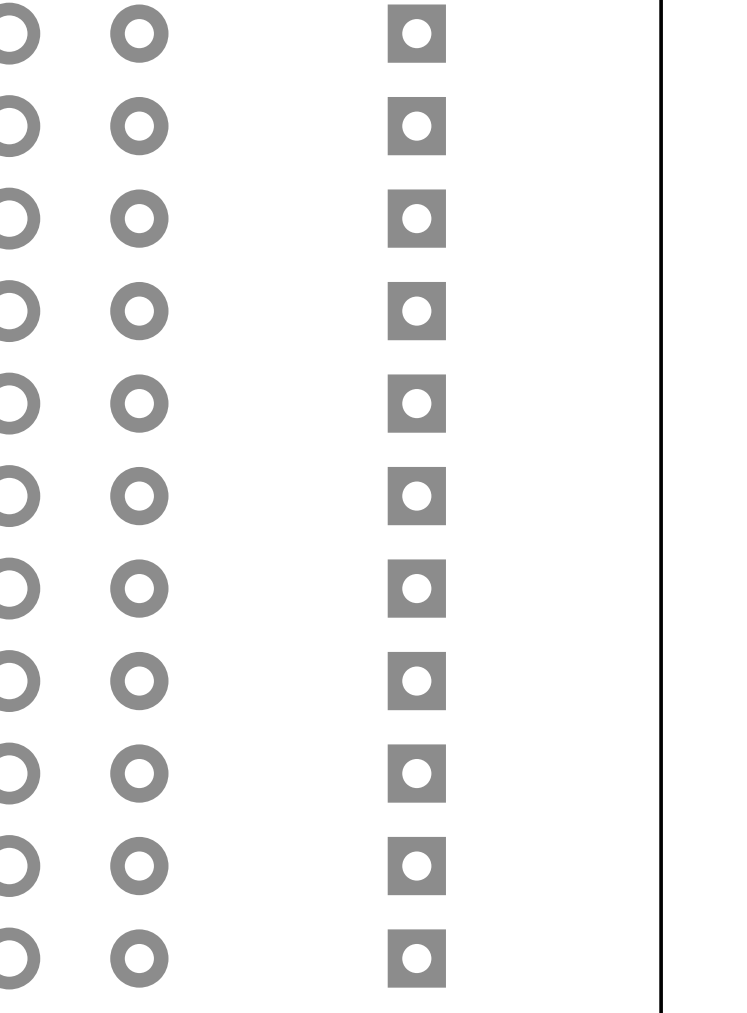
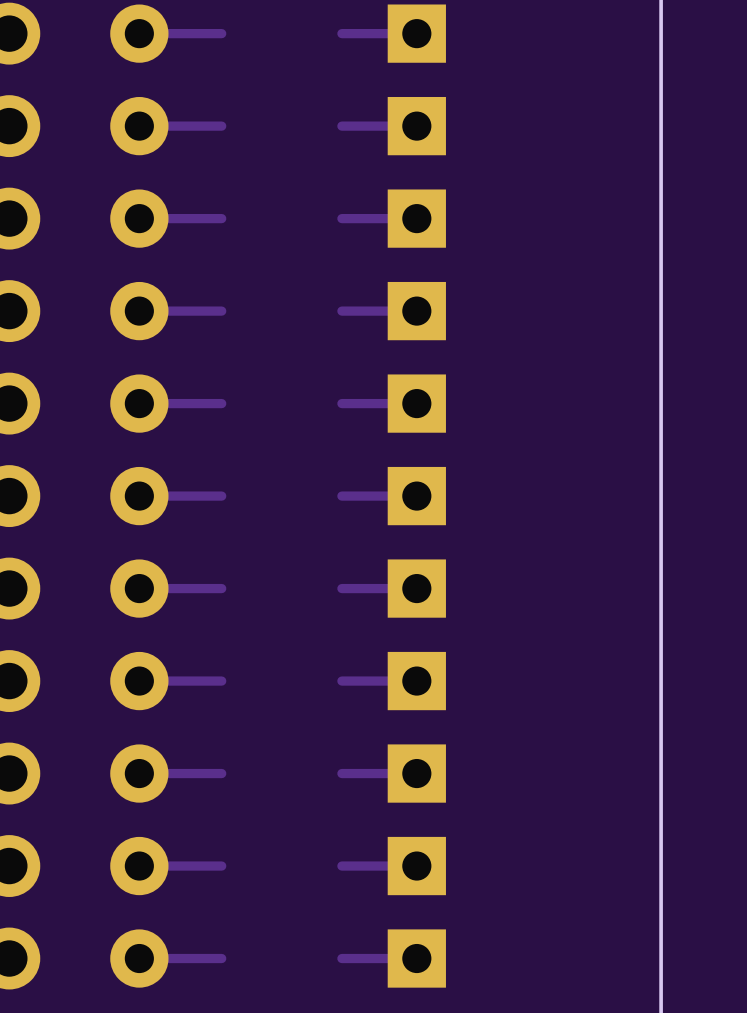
track: none -> (221, 33) (142, 33)
track: none -> (420, 33) (341, 33)
track: none -> (221, 126) (142, 126)
track: none -> (420, 126) (341, 126)
track: none -> (221, 218) (142, 218)
track: none -> (420, 218) (341, 218)
track: none -> (221, 311) (142, 311)
track: none -> (420, 311) (341, 311)
track: none -> (221, 403) (142, 403)
track: none -> (420, 403) (341, 403)
track: none -> (221, 496) (142, 496)
track: none -> (420, 496) (341, 496)
track: none -> (221, 588) (142, 588)
track: none -> (420, 588) (341, 588)
track: none -> (221, 681) (142, 681)
track: none -> (420, 681) (341, 681)
track: none -> (221, 773) (142, 773)
track: none -> (420, 773) (341, 773)
track: none -> (221, 866) (142, 866)
track: none -> (420, 866) (341, 866)
track: none -> (221, 958) (142, 958)
track: none -> (420, 958) (341, 958)

